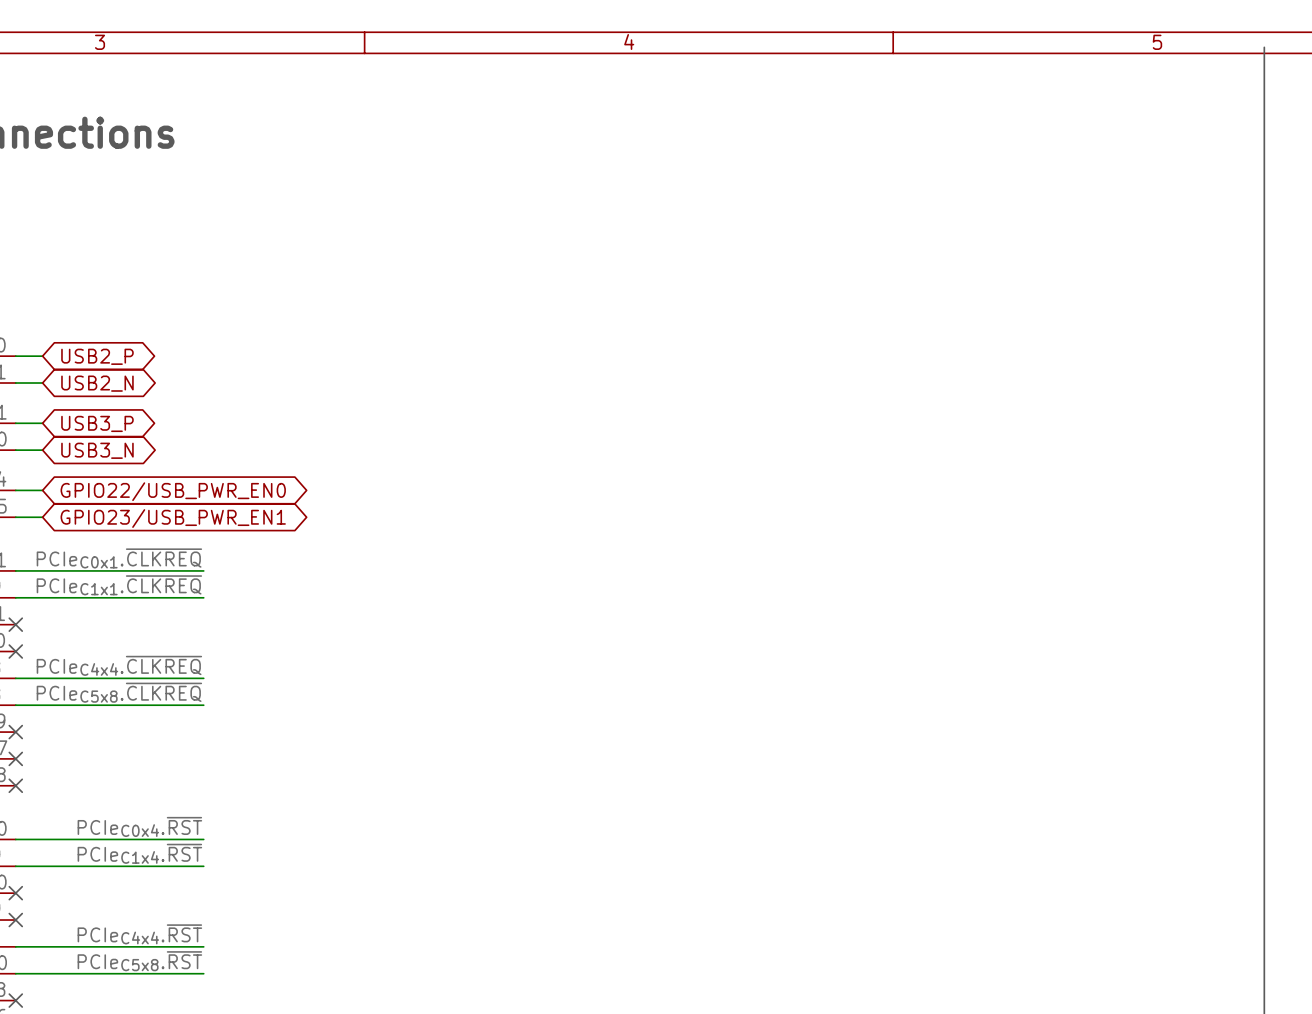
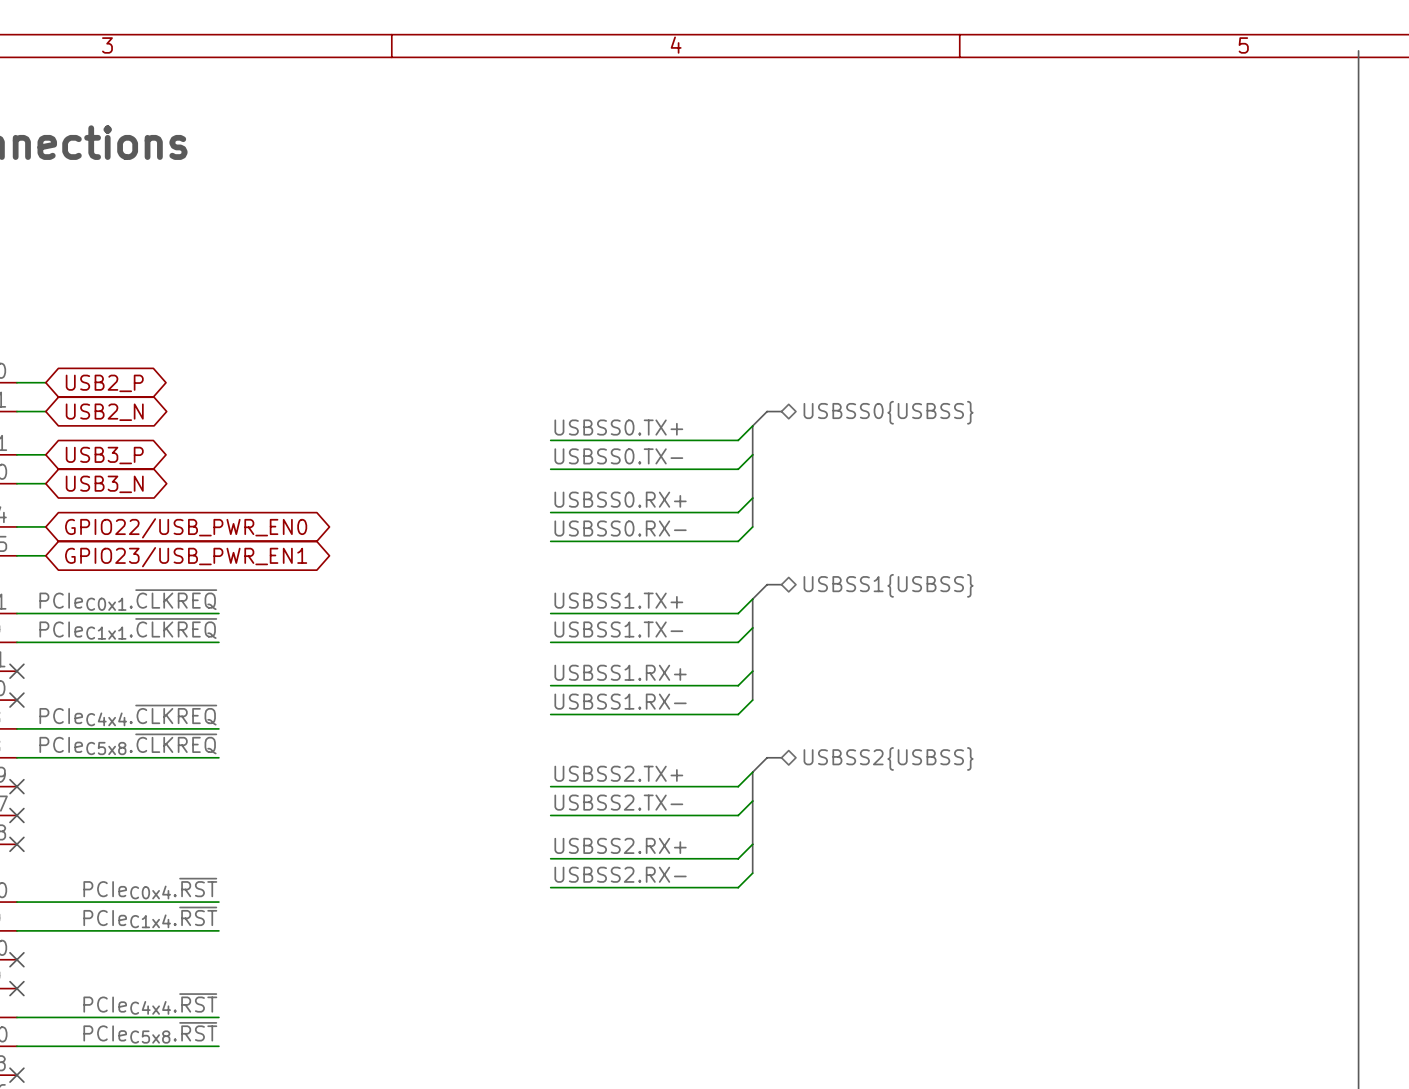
bus: none -> (781, 411) (767, 411) (752, 425) (752, 526)
hierarchical label: none -> USBSS0{USBSS} (888, 412)
wire: none -> (752, 425) (738, 440) (550, 440)
label: none -> USBSS0.TX+ (618, 427)
wire: none -> (752, 454) (738, 469) (550, 469)
label: none -> USBSS0.TX- (618, 456)
wire: none -> (752, 498) (738, 512) (550, 512)
label: none -> USBSS0.RX+ (620, 499)
wire: none -> (752, 526) (738, 541) (550, 541)
label: none -> USBSS0.RX- (620, 528)
bus: none -> (781, 584) (767, 584) (752, 599) (752, 700)
hierarchical label: none -> USBSS1{USBSS} (888, 585)
wire: none -> (752, 599) (738, 613) (550, 613)
label: none -> USBSS1.TX+ (618, 600)
wire: none -> (752, 627) (738, 642) (550, 642)
label: none -> USBSS1.TX- (618, 629)
wire: none -> (752, 671) (738, 685) (550, 685)
label: none -> USBSS1.RX+ (620, 672)
wire: none -> (752, 700) (738, 714) (550, 714)
label: none -> USBSS1.RX- (620, 701)
bus: none -> (781, 757) (767, 757) (752, 772) (752, 873)
hierarchical label: none -> USBSS2{USBSS} (888, 758)
wire: none -> (752, 772) (738, 786) (550, 786)
label: none -> USBSS2.TX+ (618, 773)
wire: none -> (752, 801) (738, 815) (550, 815)
label: none -> USBSS2.TX- (618, 802)
wire: none -> (752, 844) (738, 858) (550, 858)
label: none -> USBSS2.RX+ (620, 845)
wire: none -> (752, 873) (738, 887) (550, 887)
label: none -> USBSS2.RX- (620, 874)

